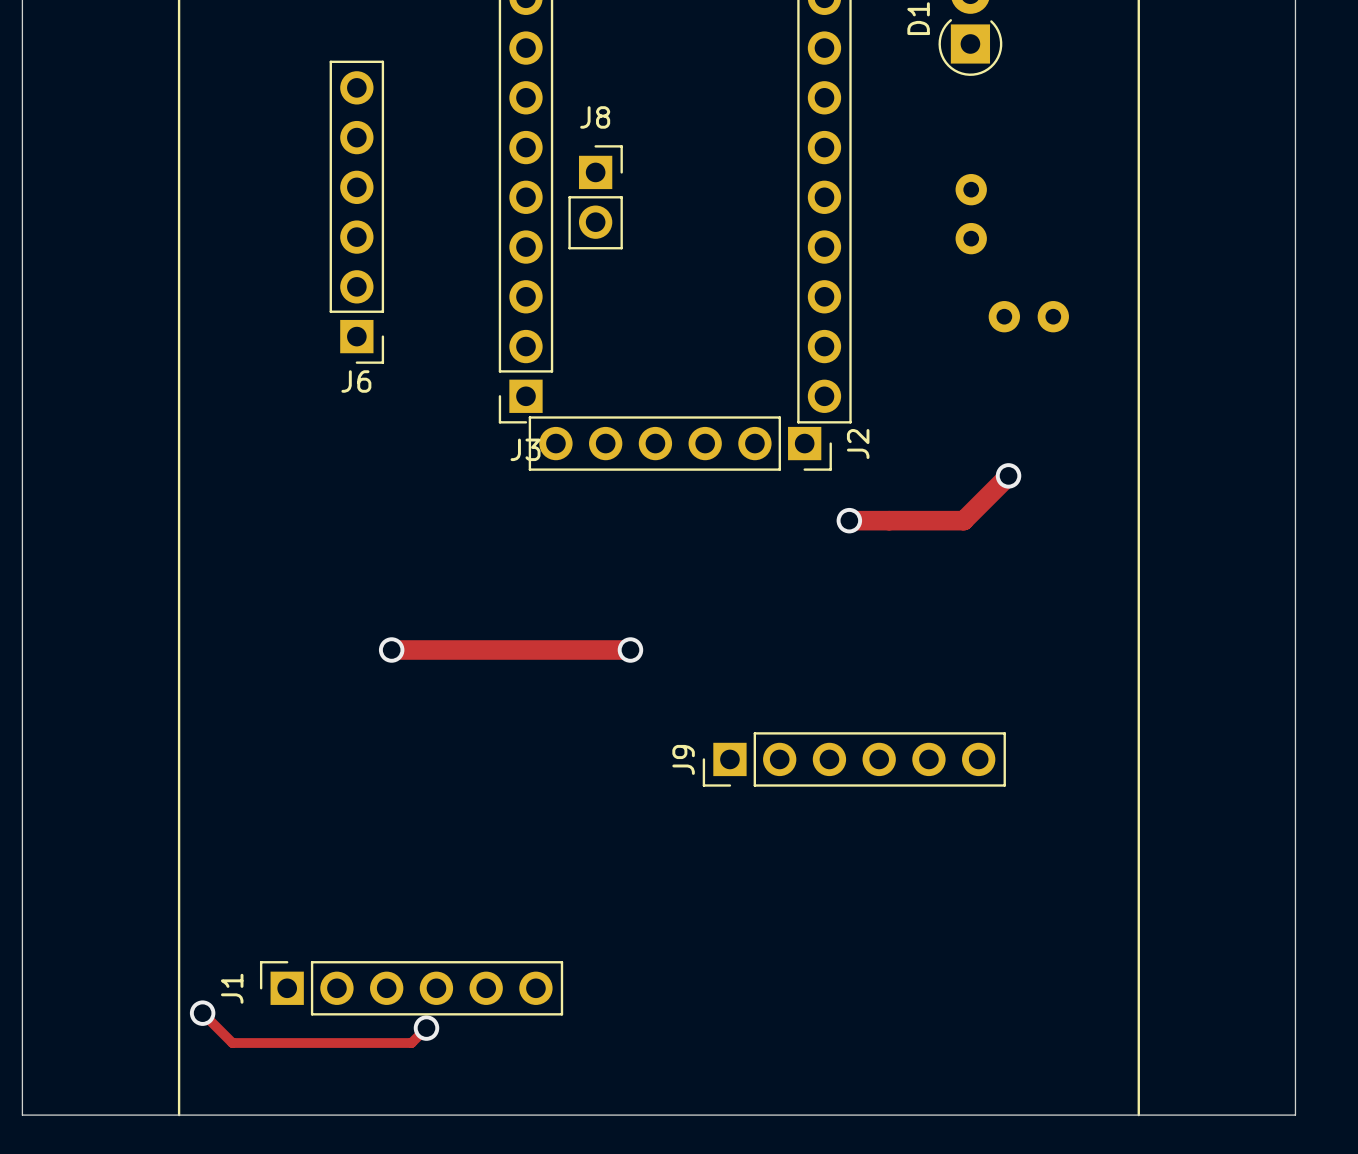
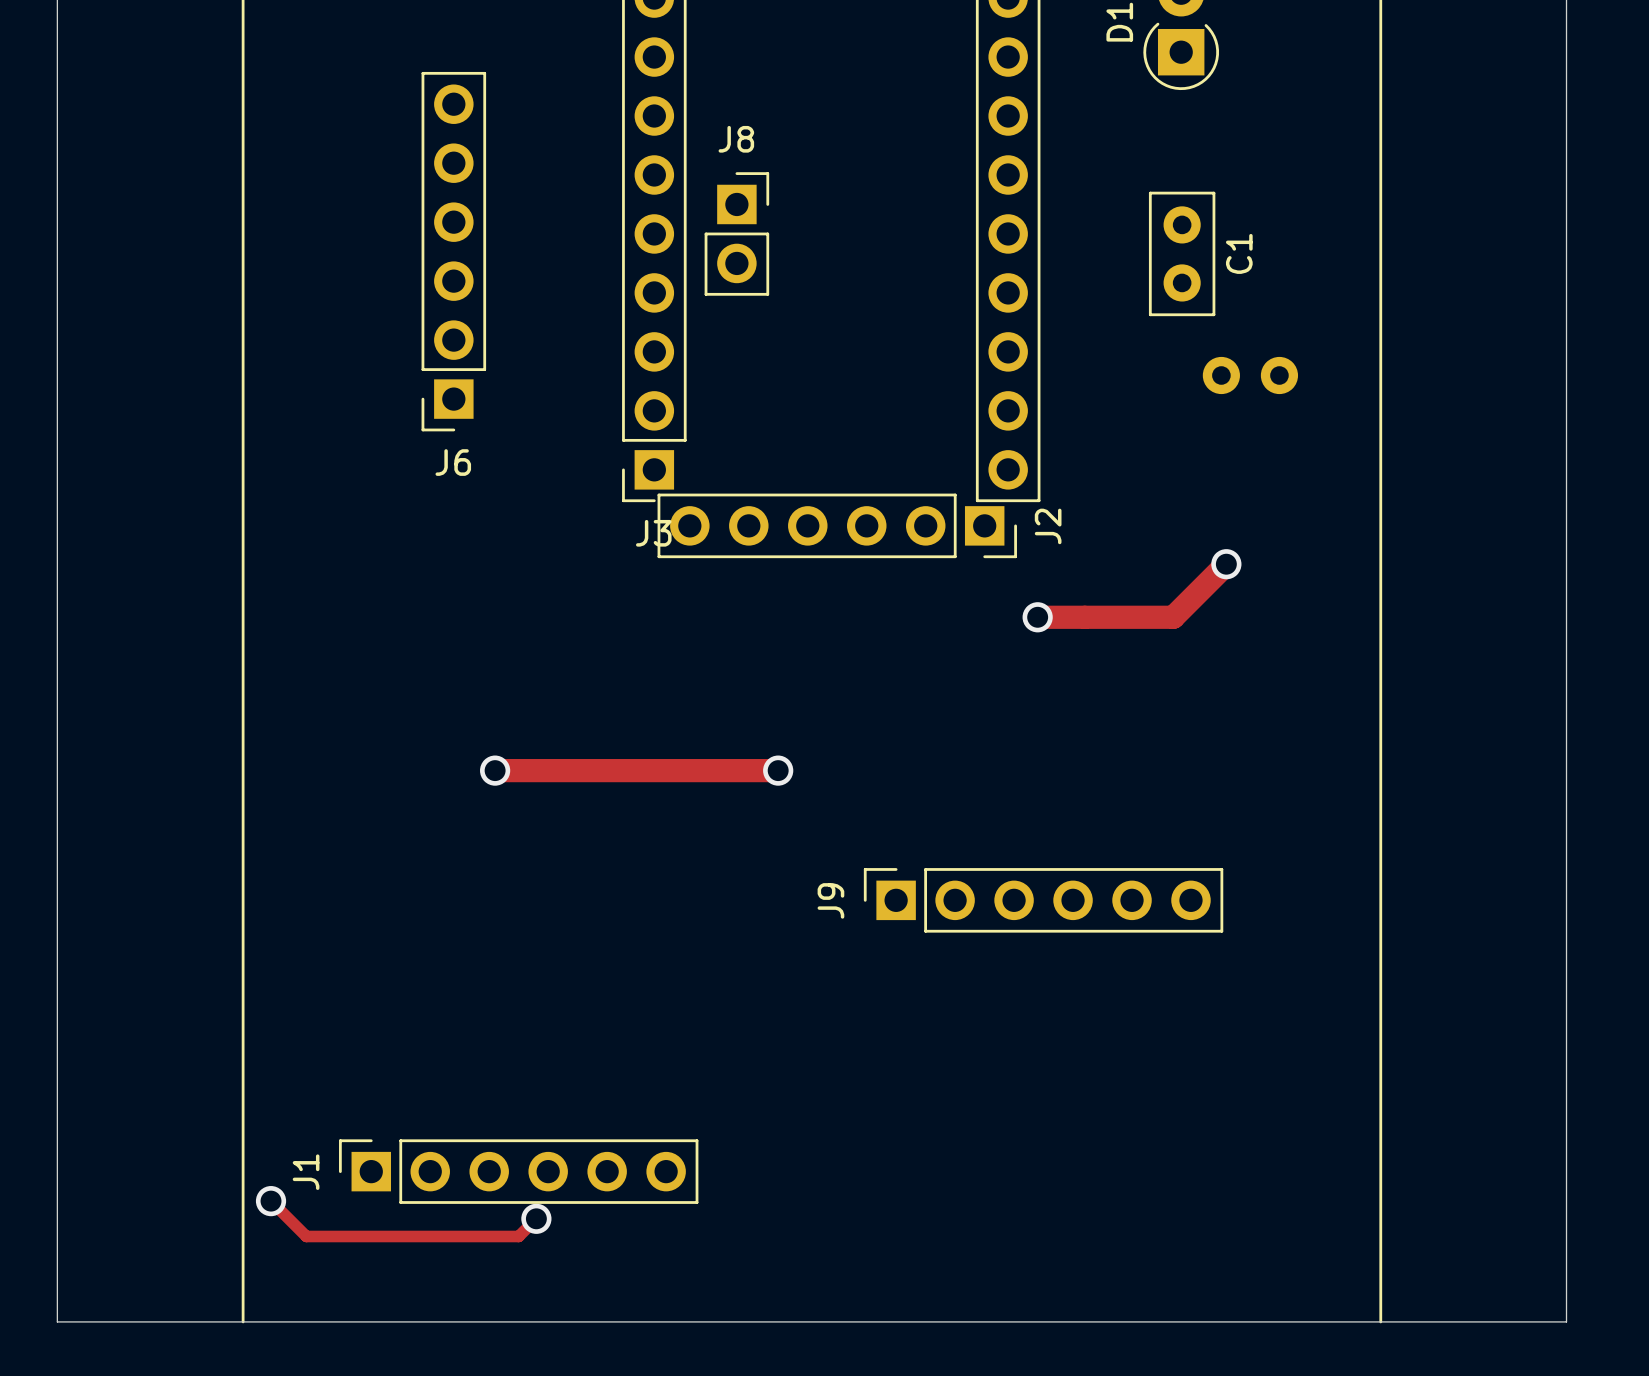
J6 footprint: [329, 60, 385, 364] -> [421, 71, 487, 432]
C1 side: bottom (971, 214) -> top (1182, 253)
J9 footprint: [702, 732, 1006, 787] -> [863, 868, 1224, 933]

